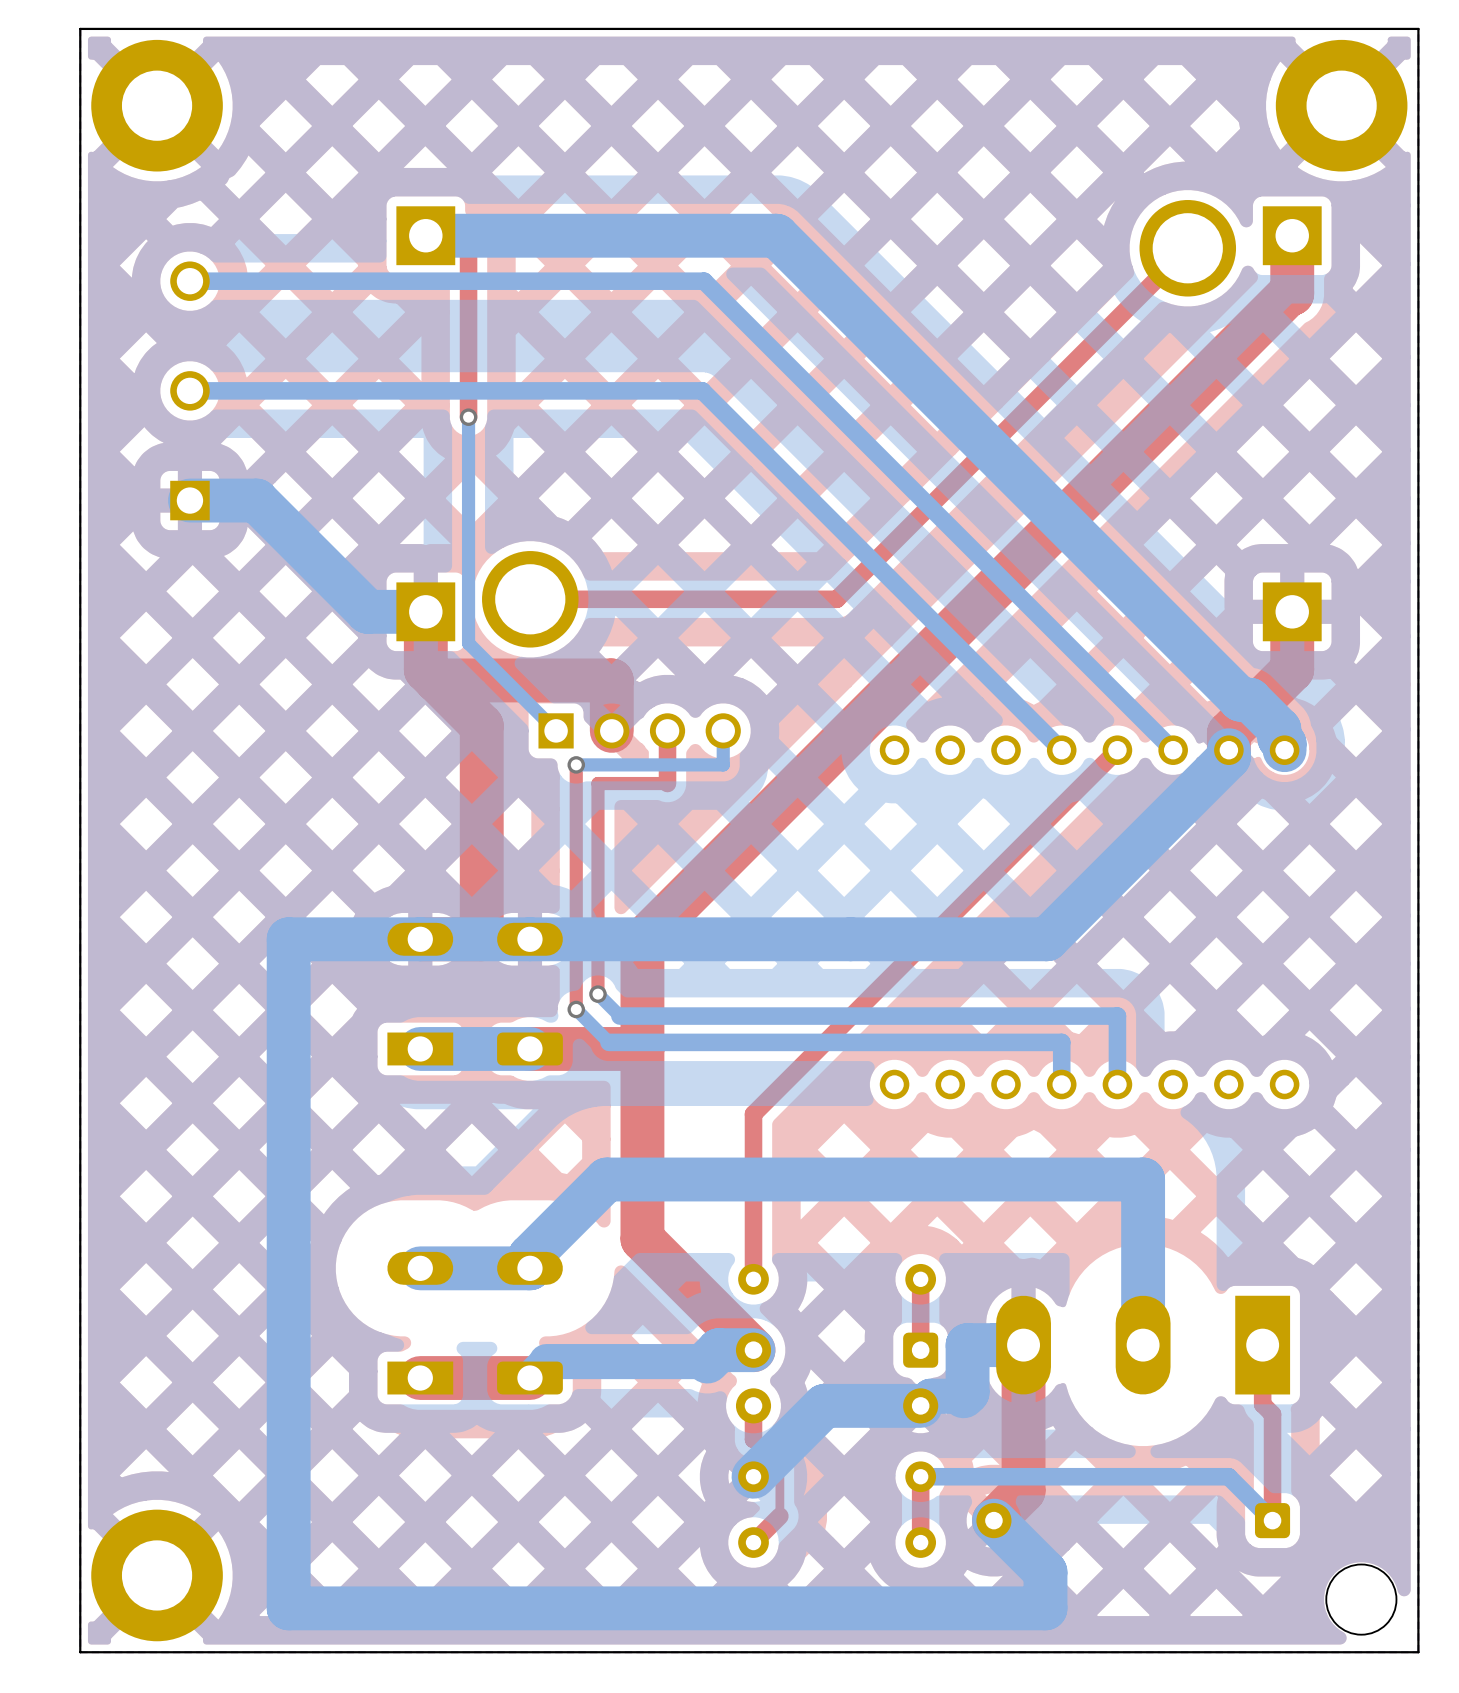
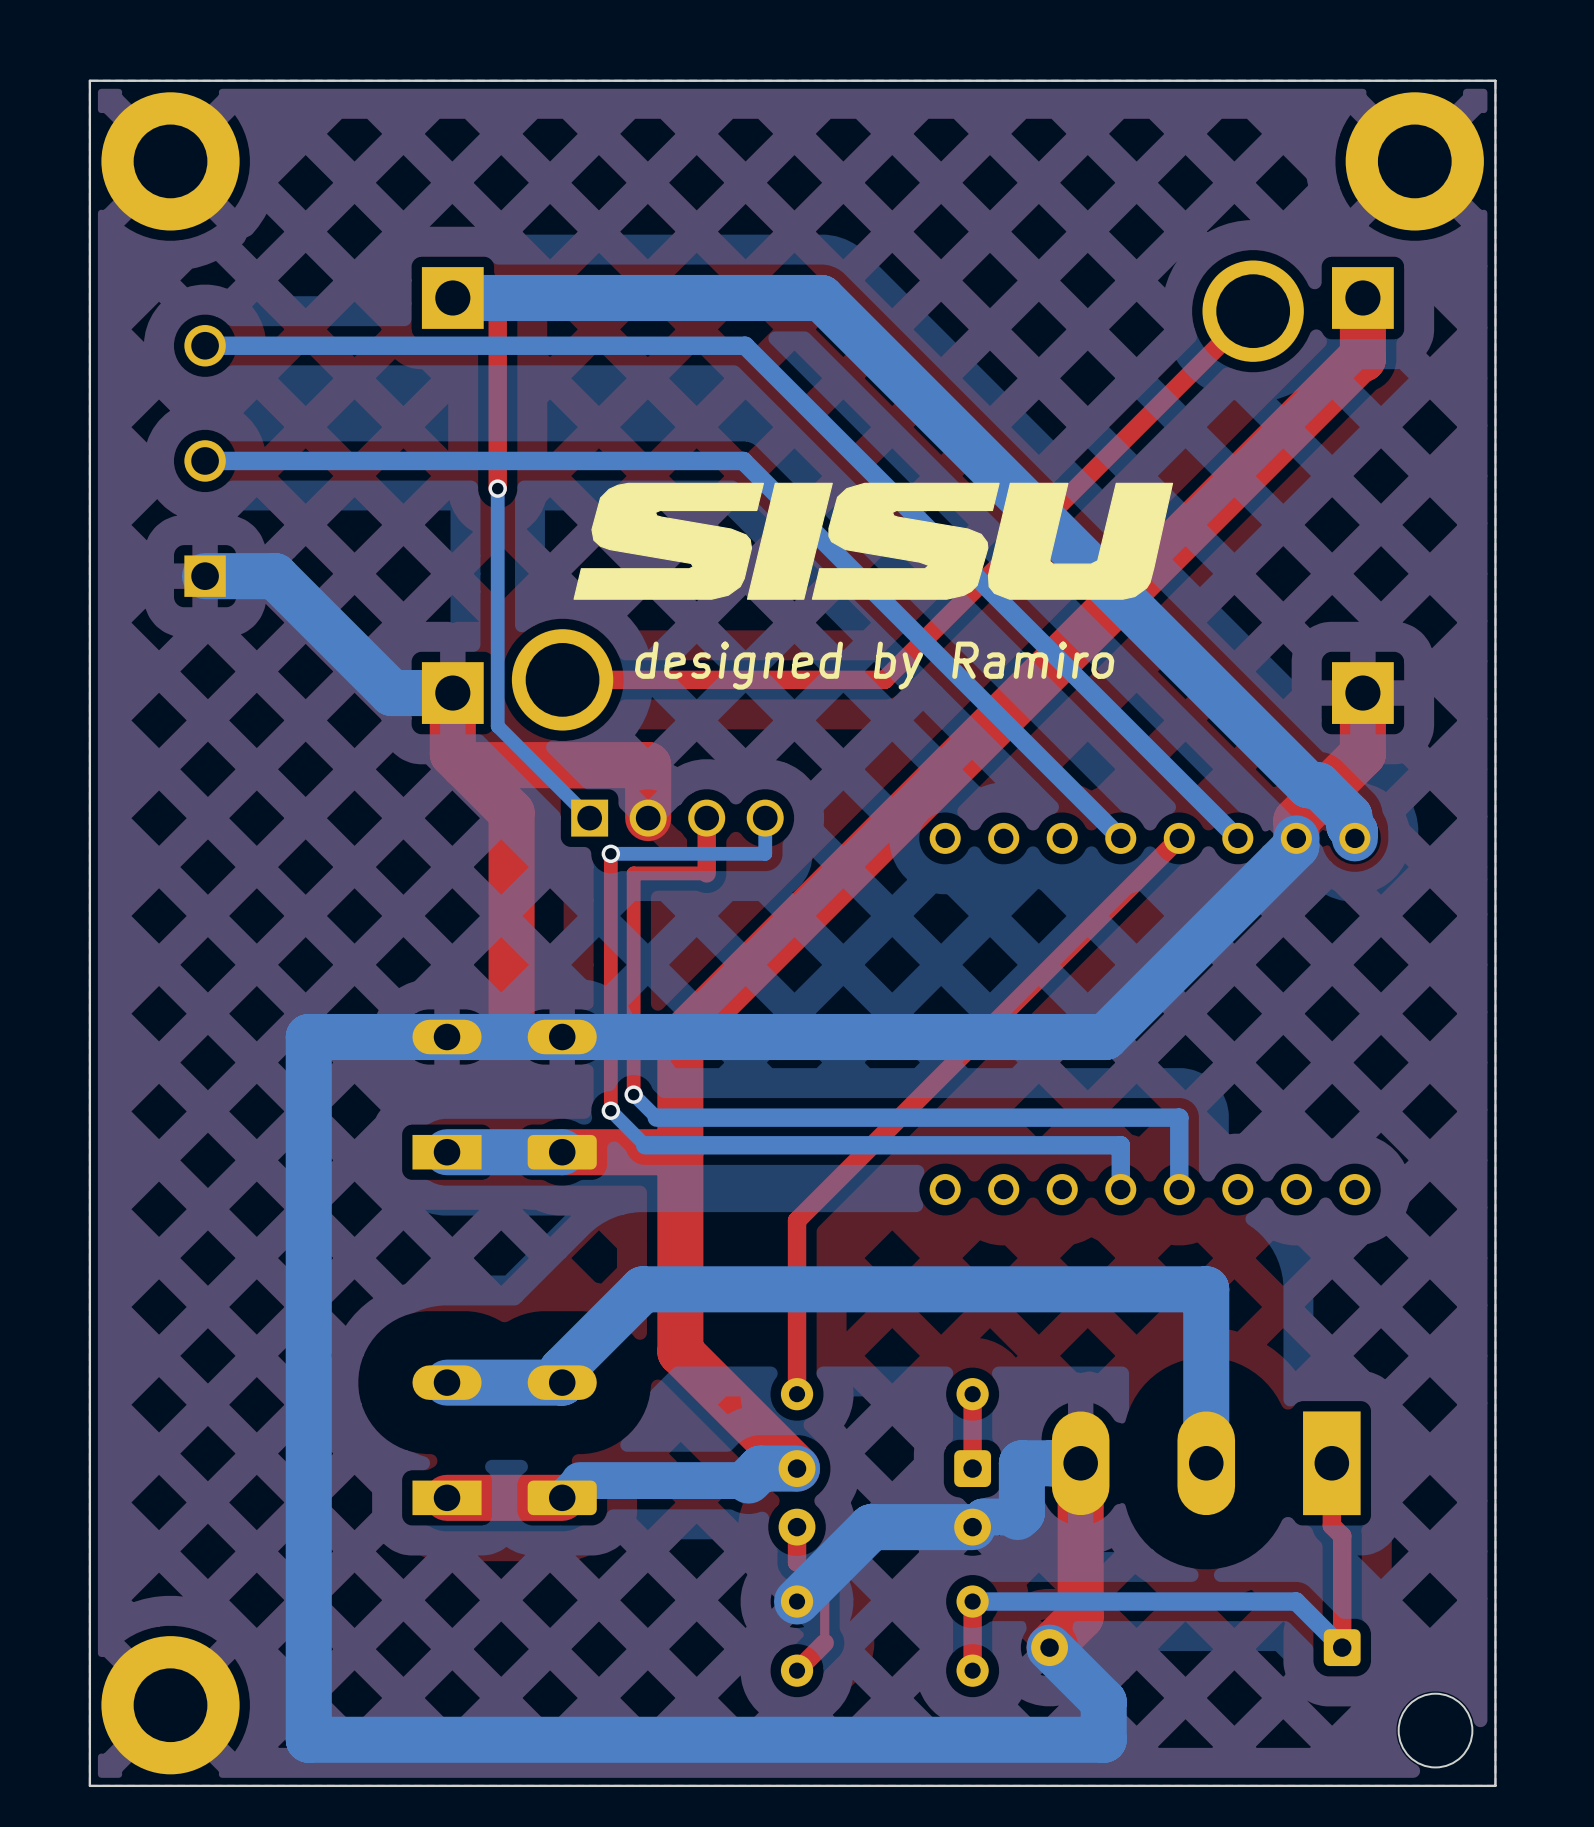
drawing: none -> [573, 482, 1174, 600]
text: none -> designed by Ramiro (874, 665)

